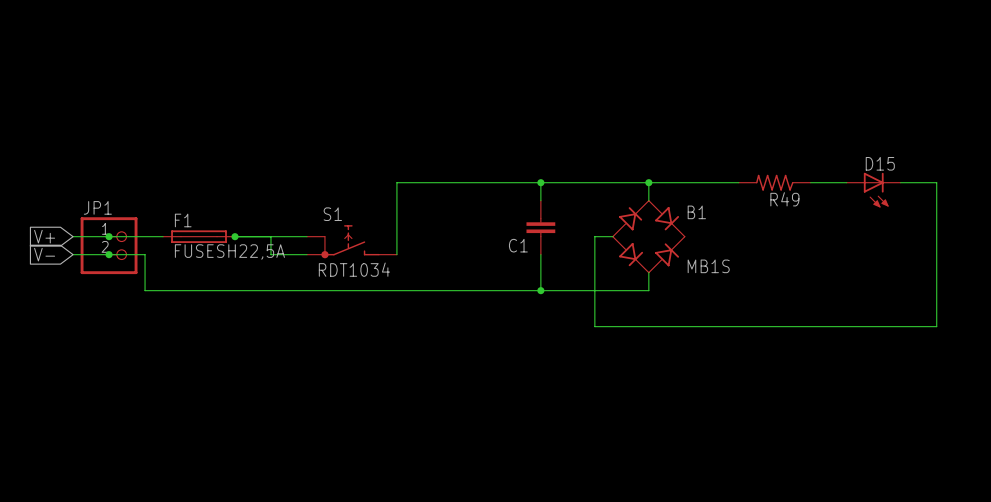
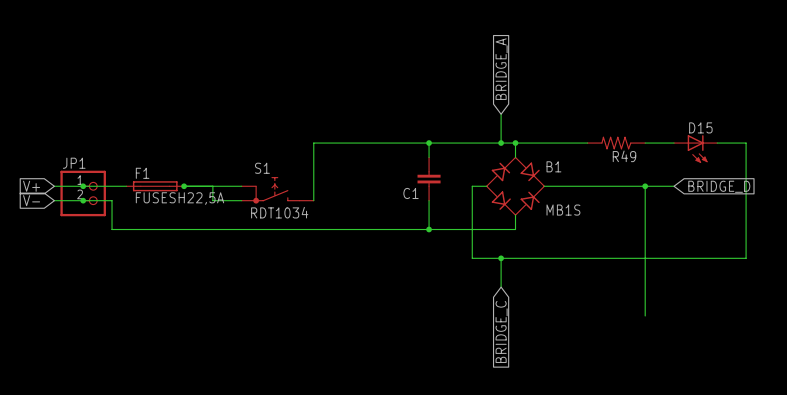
global label: none -> BRIDGE_A (501, 69)
wire: none -> (501, 114) (501, 143)
junction: none -> (501, 143)
wire: none -> (544, 186) (674, 186)
wire: none -> (645, 186) (645, 315)
junction: none -> (645, 186)
global label: none -> BRIDGE_D (719, 186)
wire: none -> (501, 258) (501, 287)
junction: none -> (501, 258)
global label: none -> BRIDGE_C (501, 331)

